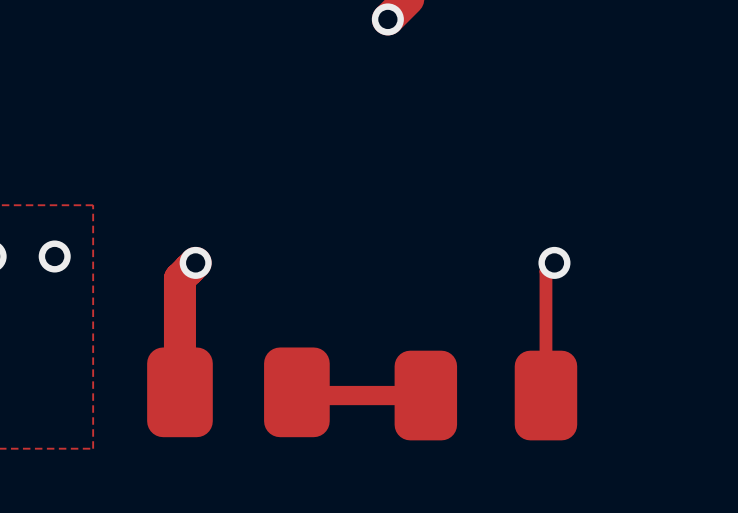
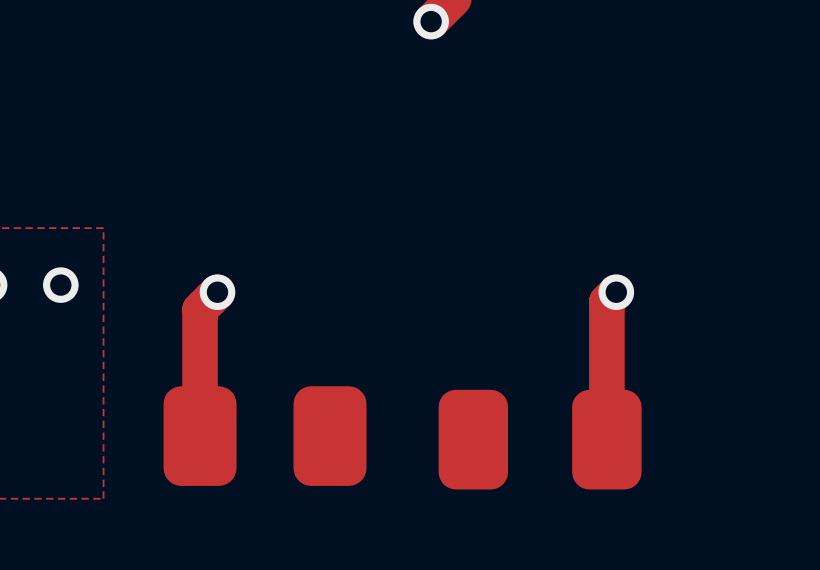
top track width: thin (554, 262) (545, 271) (545, 395) -> thick (616, 292) (606, 301) (606, 439)
top track: (296, 392) (300, 395) (425, 395) -> none

